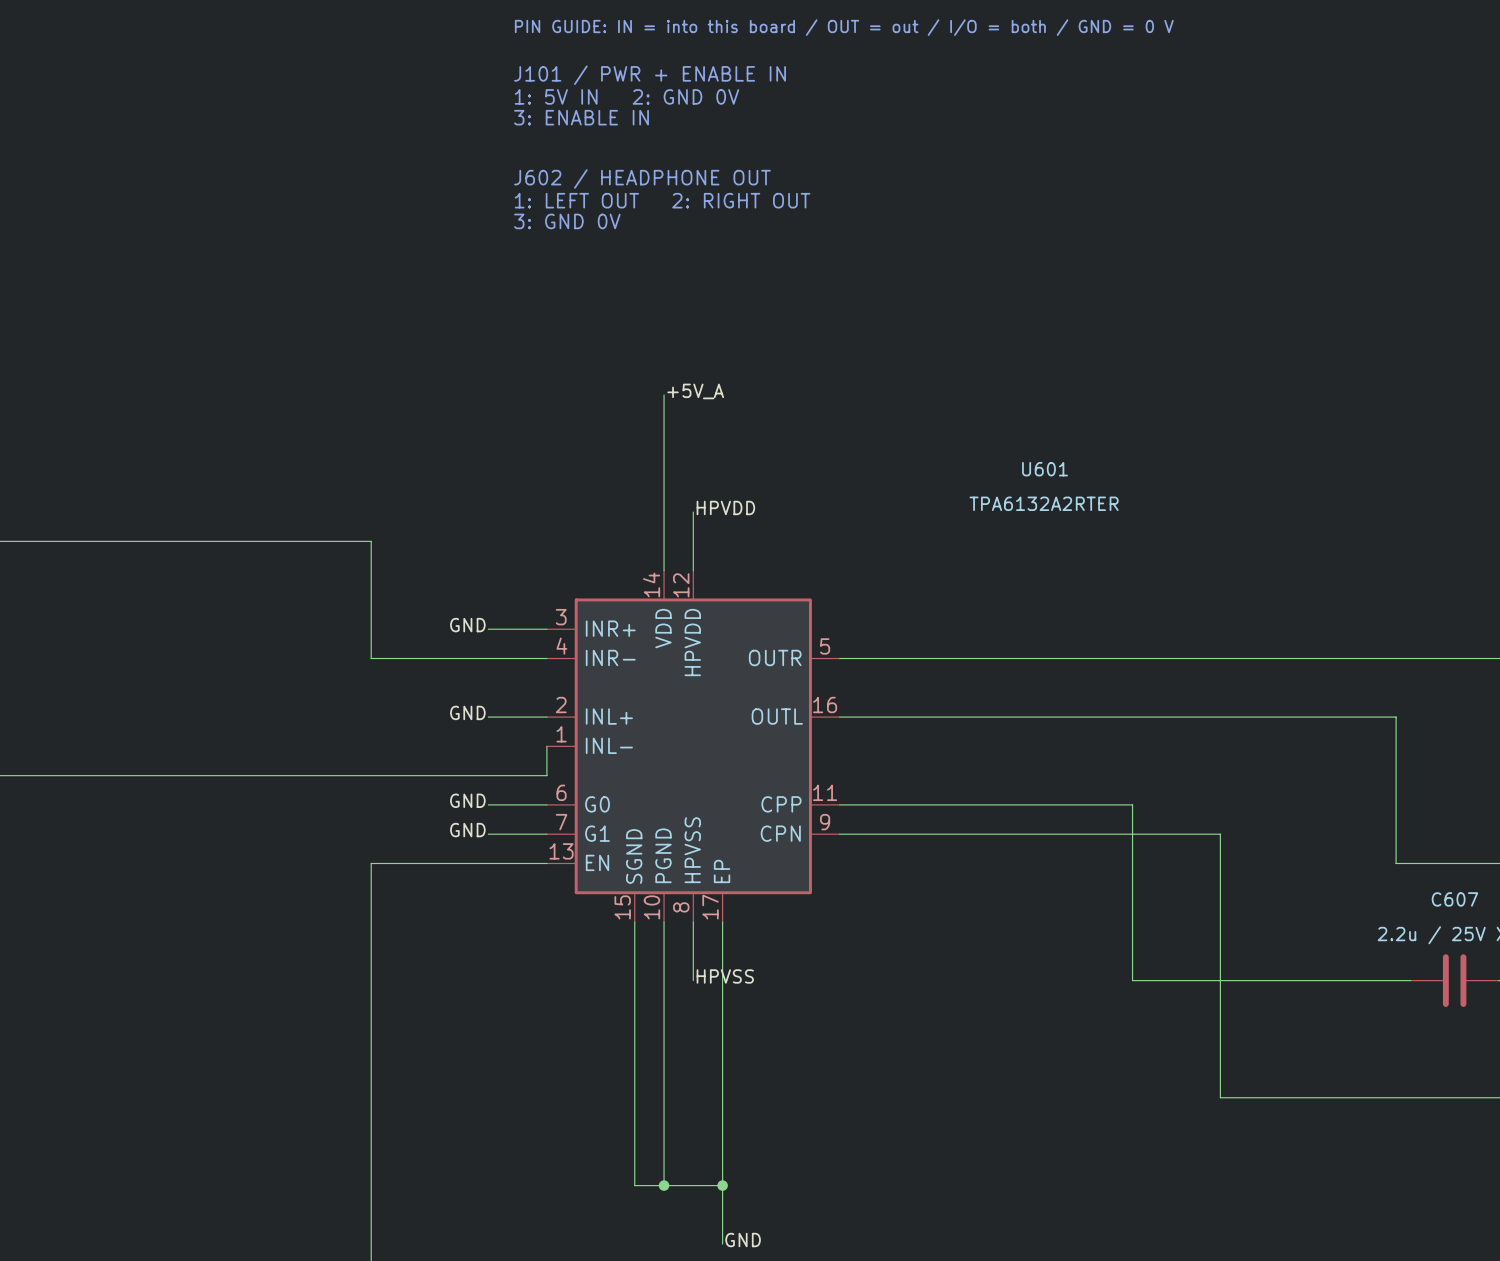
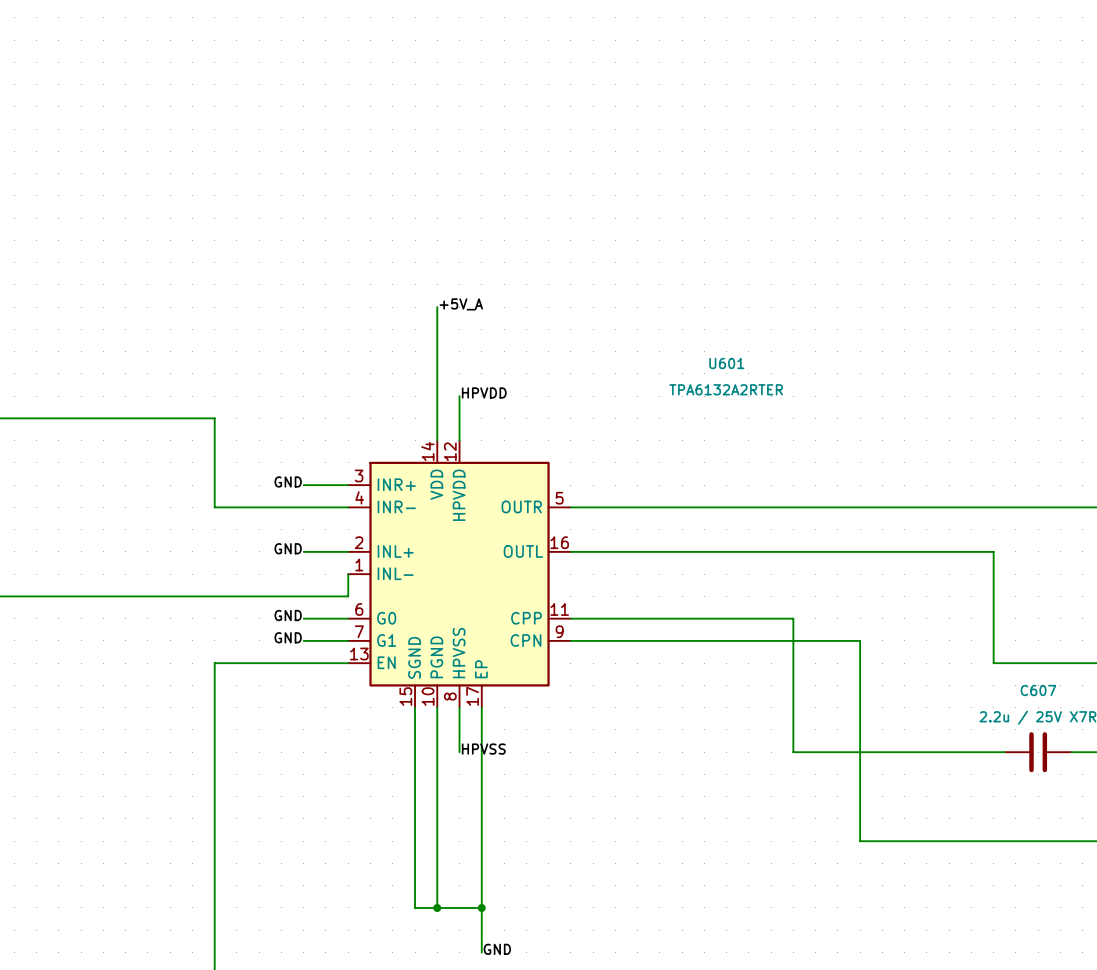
text: PIN GUIDE: IN = into this board / OUT = out / I/O = both / GND = 0 V (844, 27) -> none
text: J101 / PWR + ENABLE IN (650, 75) -> none
text: 1: 5V IN 2: GND 0V (626, 96) -> none
text: 3: ENABLE IN (581, 117) -> none
text: J602 / HEADPHONE OUT (642, 178) -> none
text: 1: LEFT OUT 2: RIGHT OUT (662, 200) -> none
text: 3: GND 0V (567, 221) -> none

